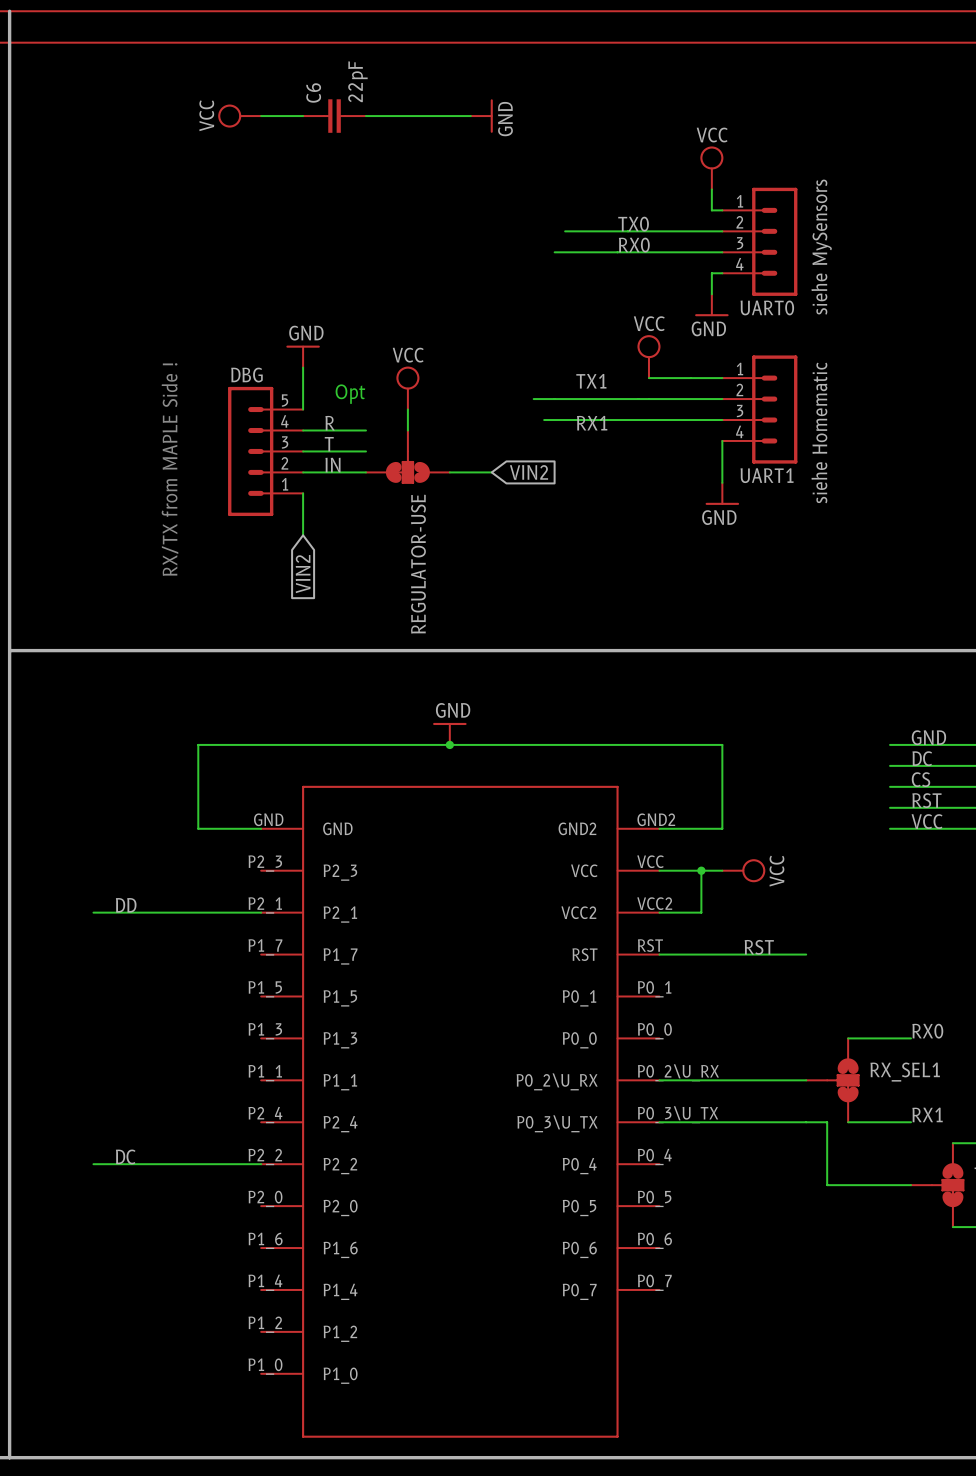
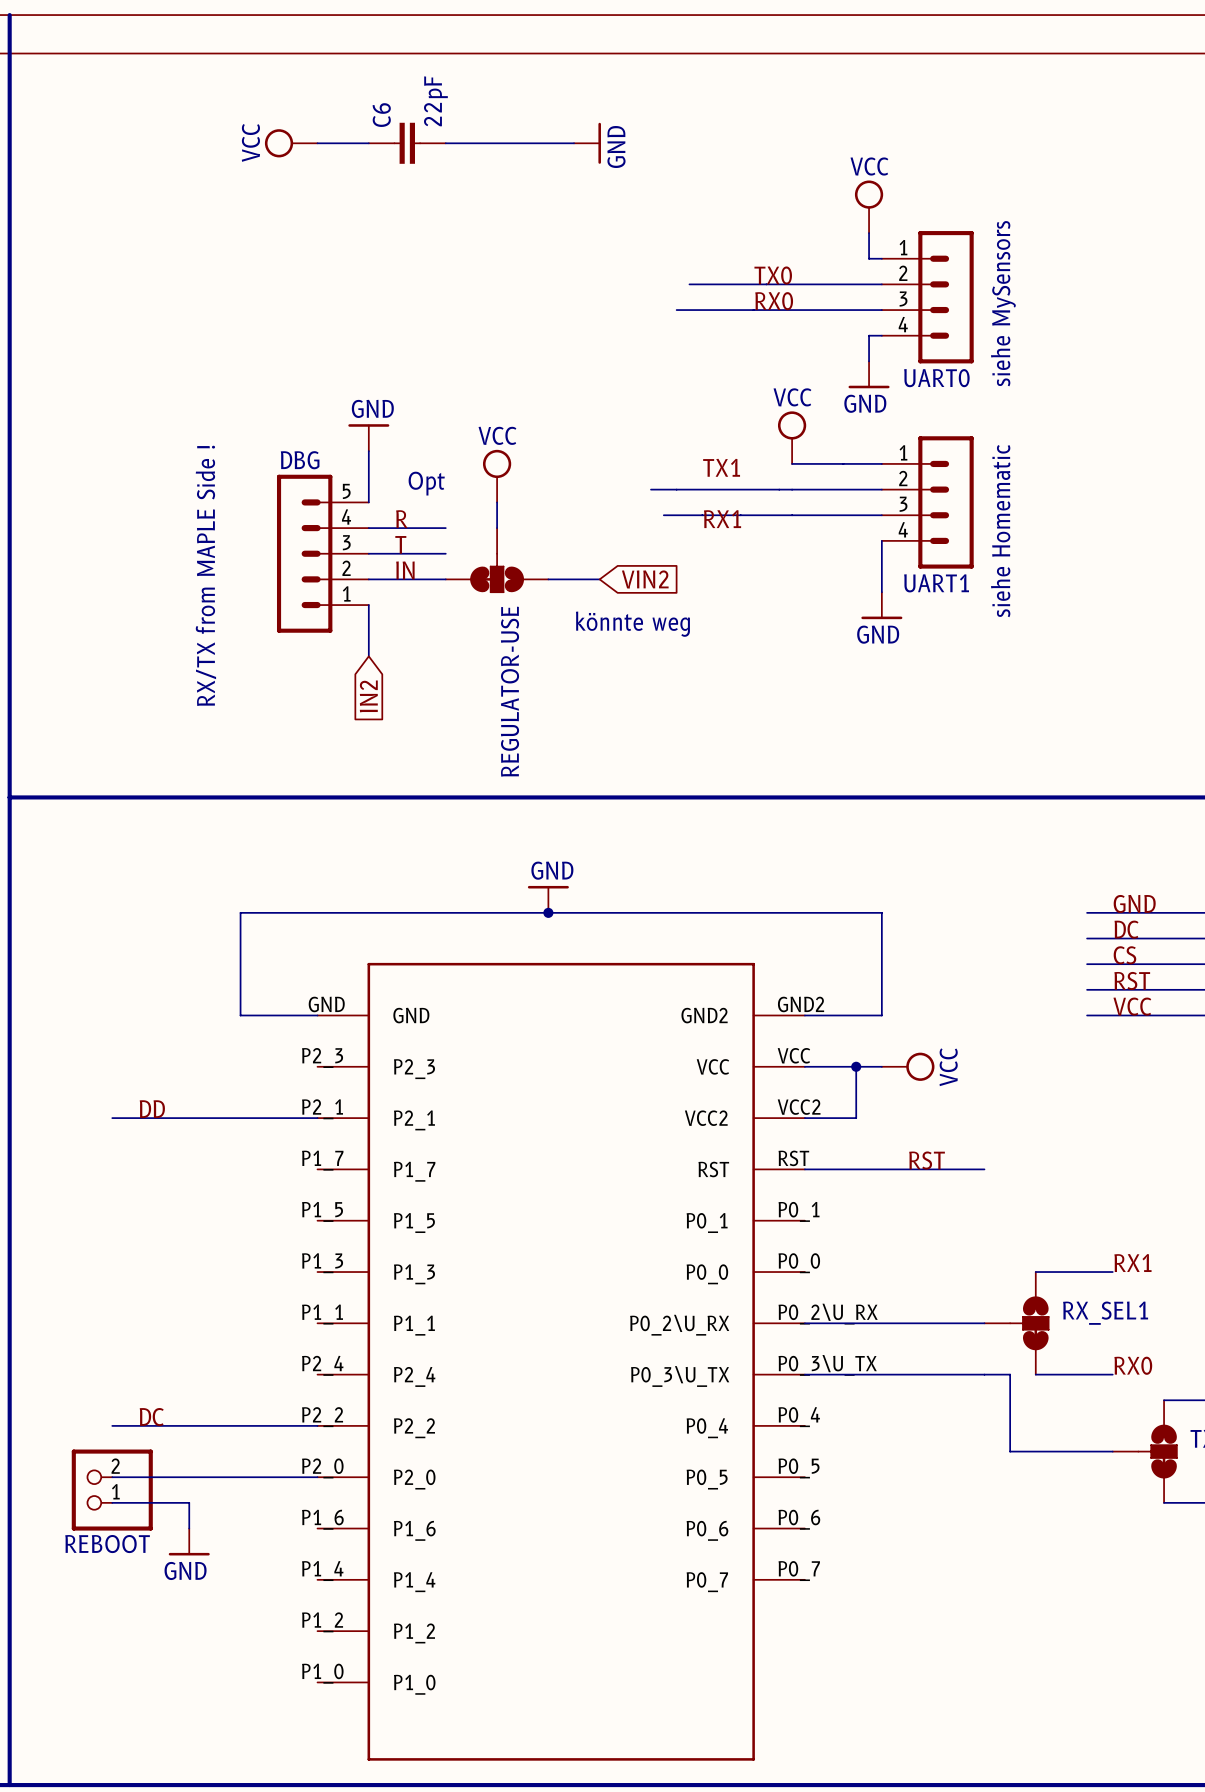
text: none -> könnte weg (632, 624)
global label: VIN2 (303, 574) -> IN2 (368, 696)
label: RX0 (927, 1031) -> RX1 (1132, 1263)
label: RX1 (927, 1114) -> RX0 (1133, 1365)
wire: none -> (112, 1477) (317, 1477)
REBOOT: none -> (112, 1490)
wire: none -> (112, 1502) (189, 1502) (189, 1528)
power symbol: none -> GND (189, 1542)

